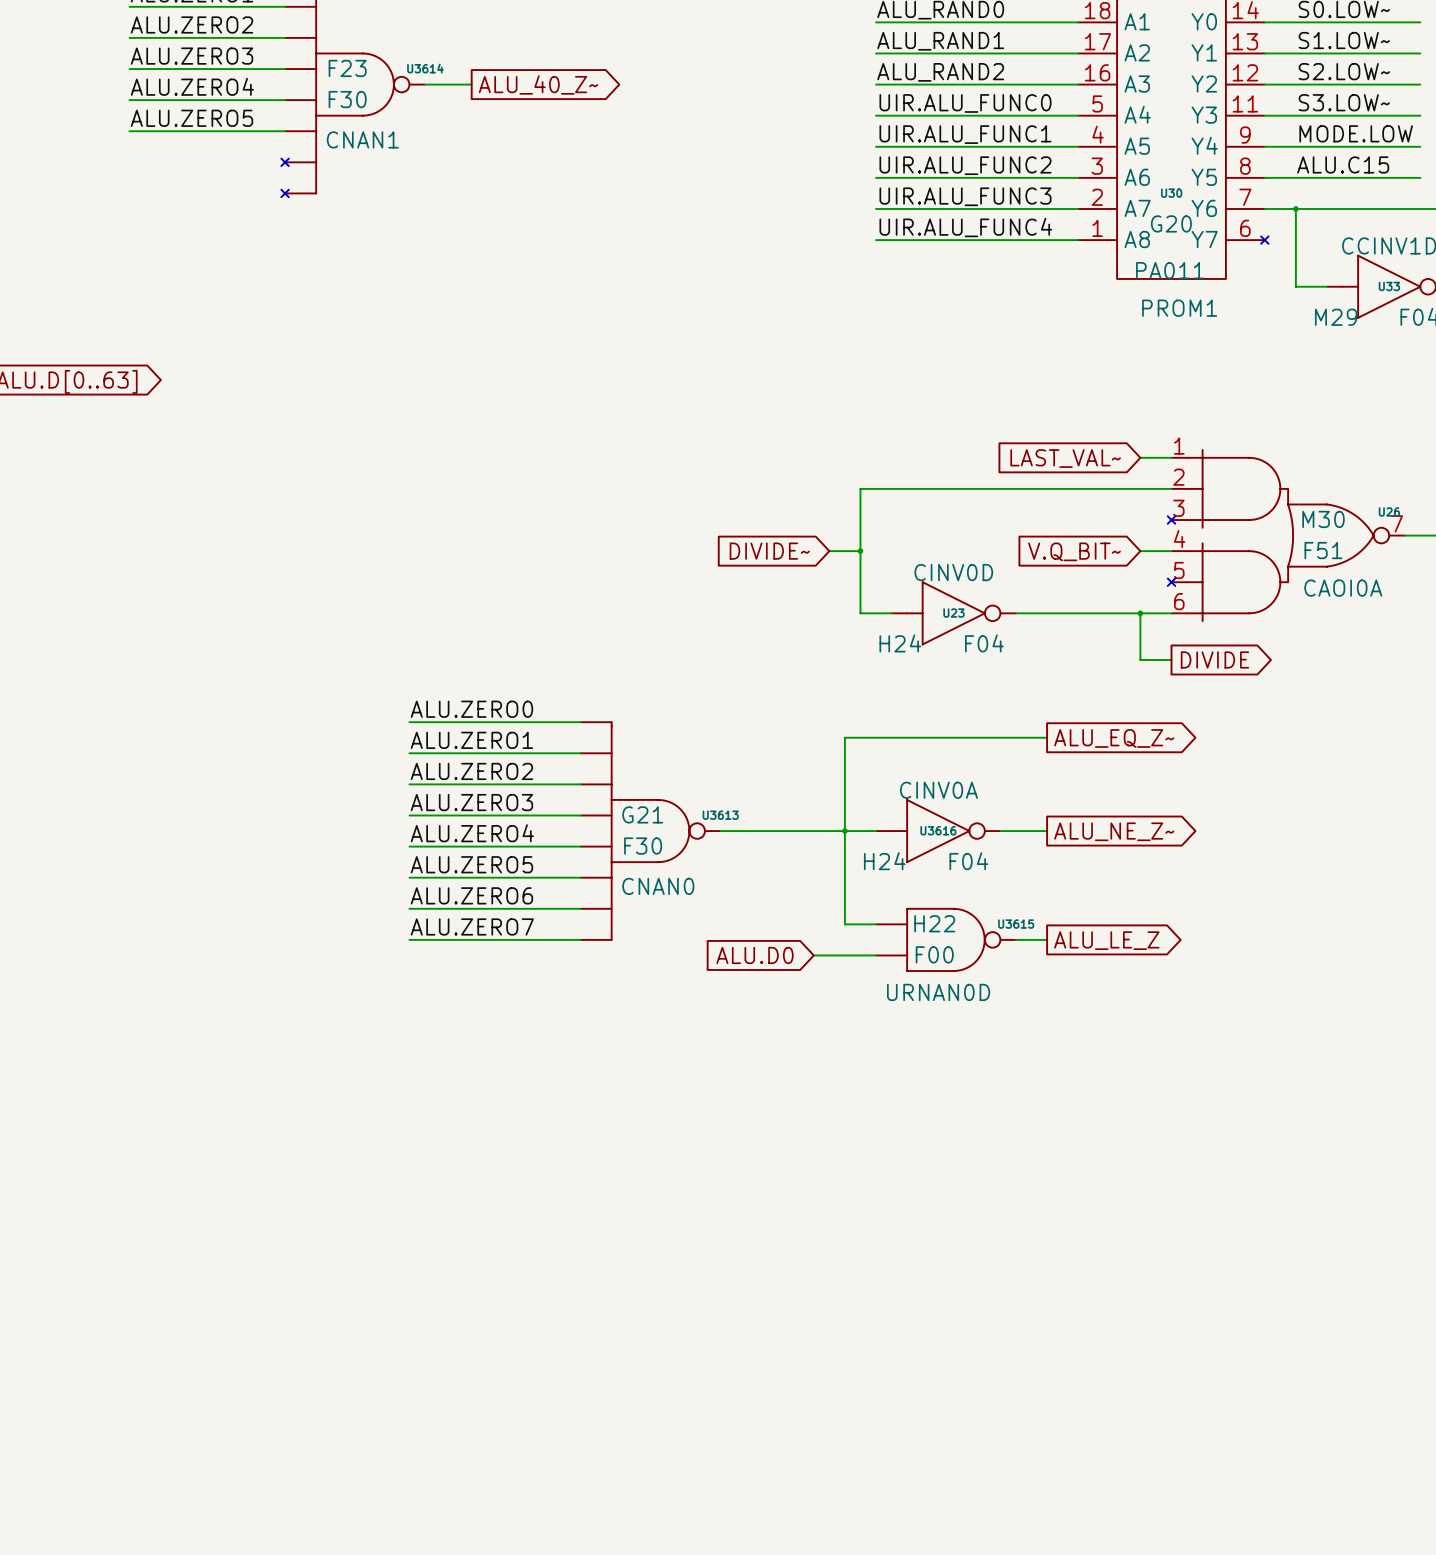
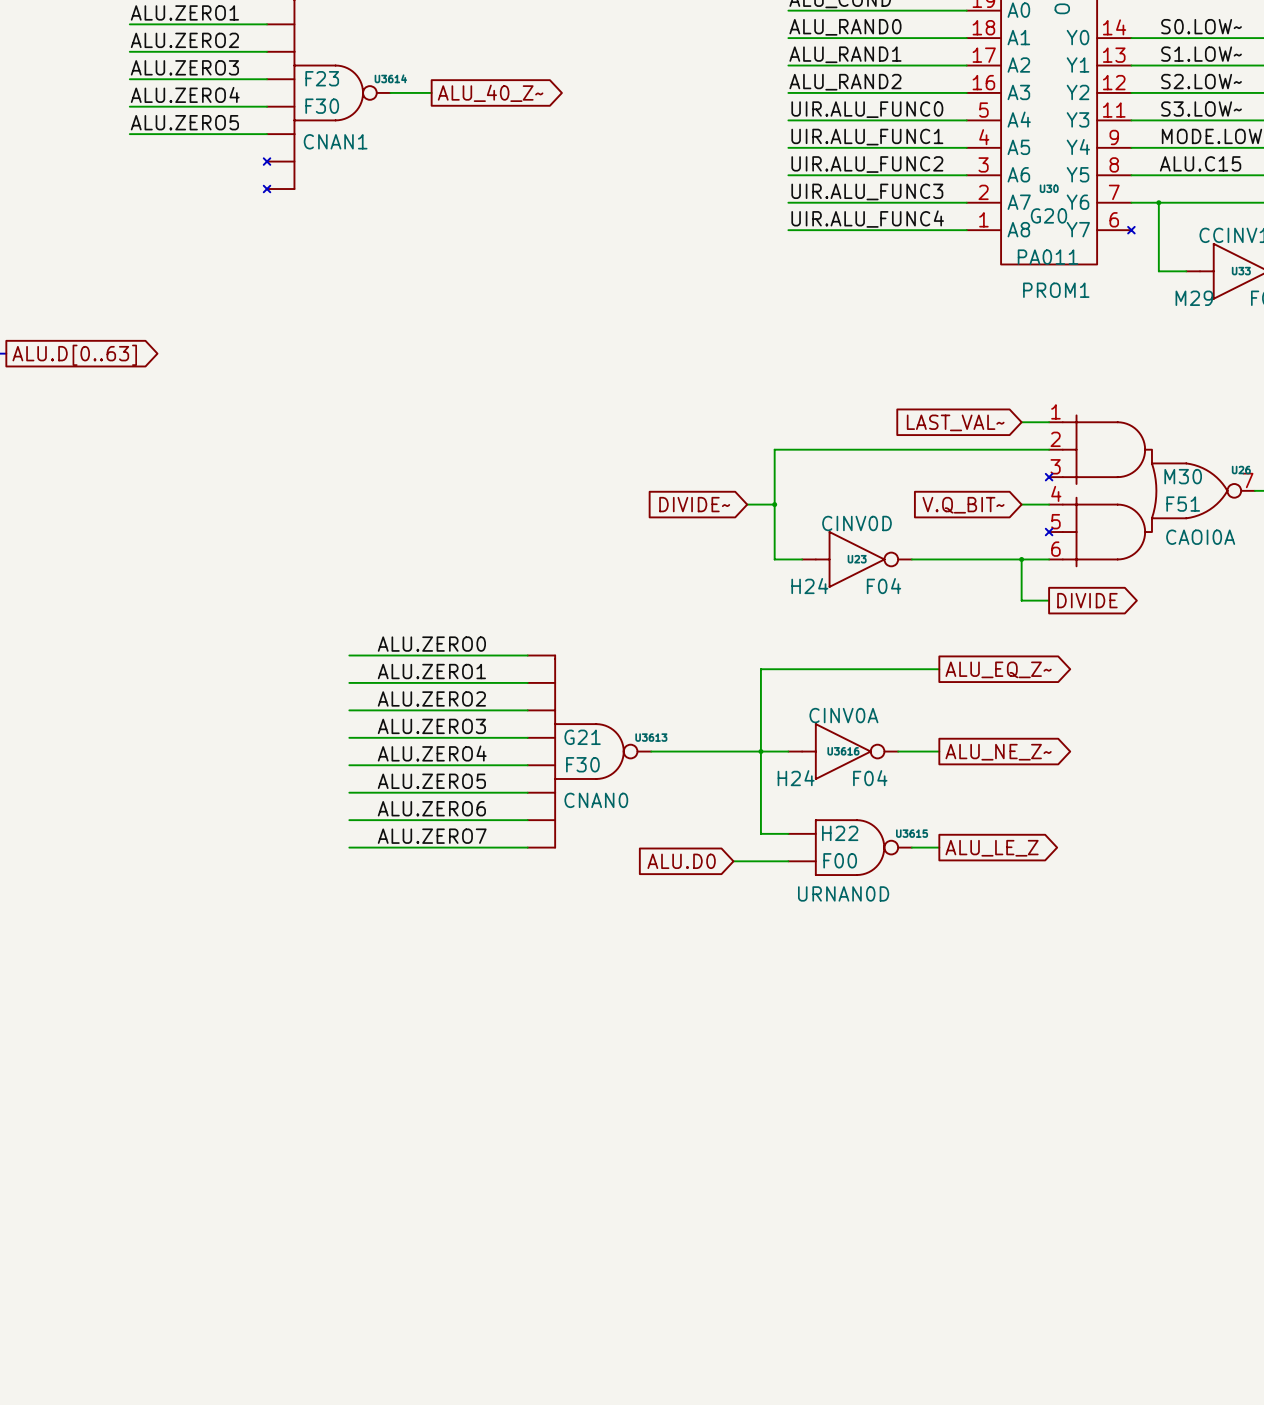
wire: none -> (349, 655) (376, 655)
wire: none -> (349, 682) (376, 682)
wire: none -> (349, 710) (376, 710)
wire: none -> (349, 737) (376, 737)
wire: none -> (349, 765) (376, 765)
wire: none -> (349, 792) (376, 792)
wire: none -> (349, 820) (376, 820)
wire: none -> (349, 847) (376, 847)

